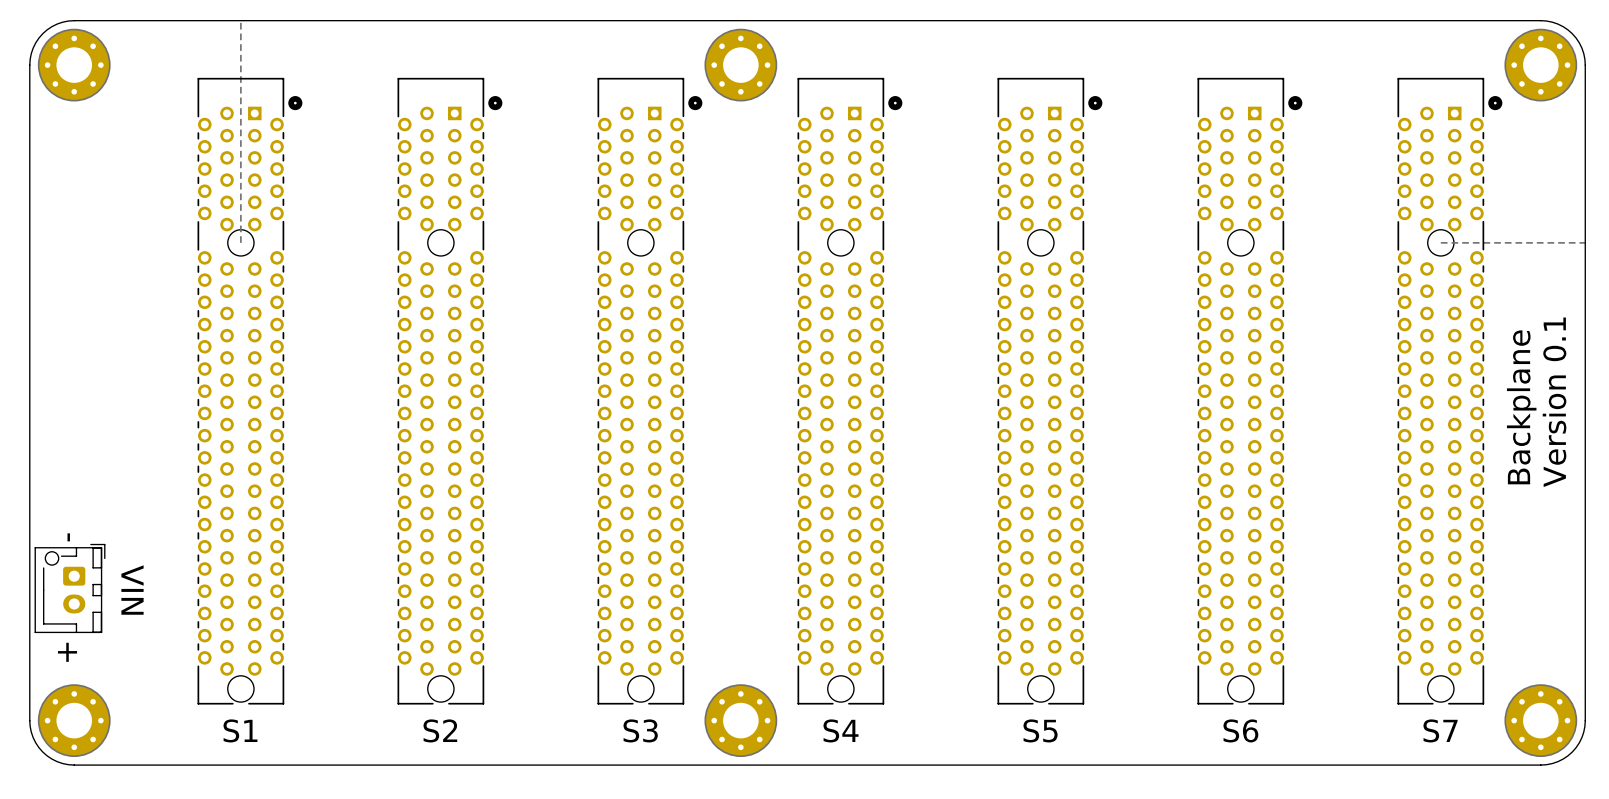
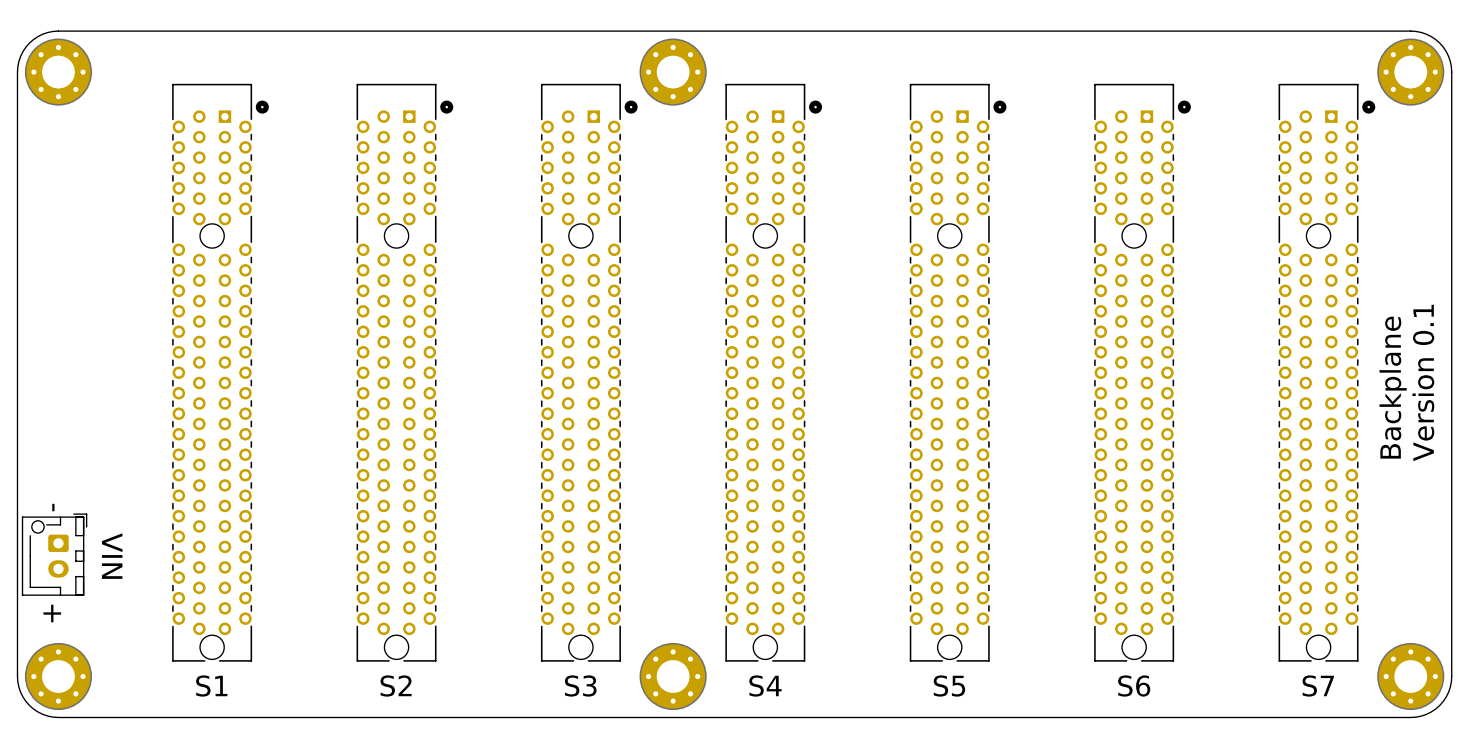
line: (240, 20) (240, 242) -> none
line: (1440, 242) (1585, 242) -> none

